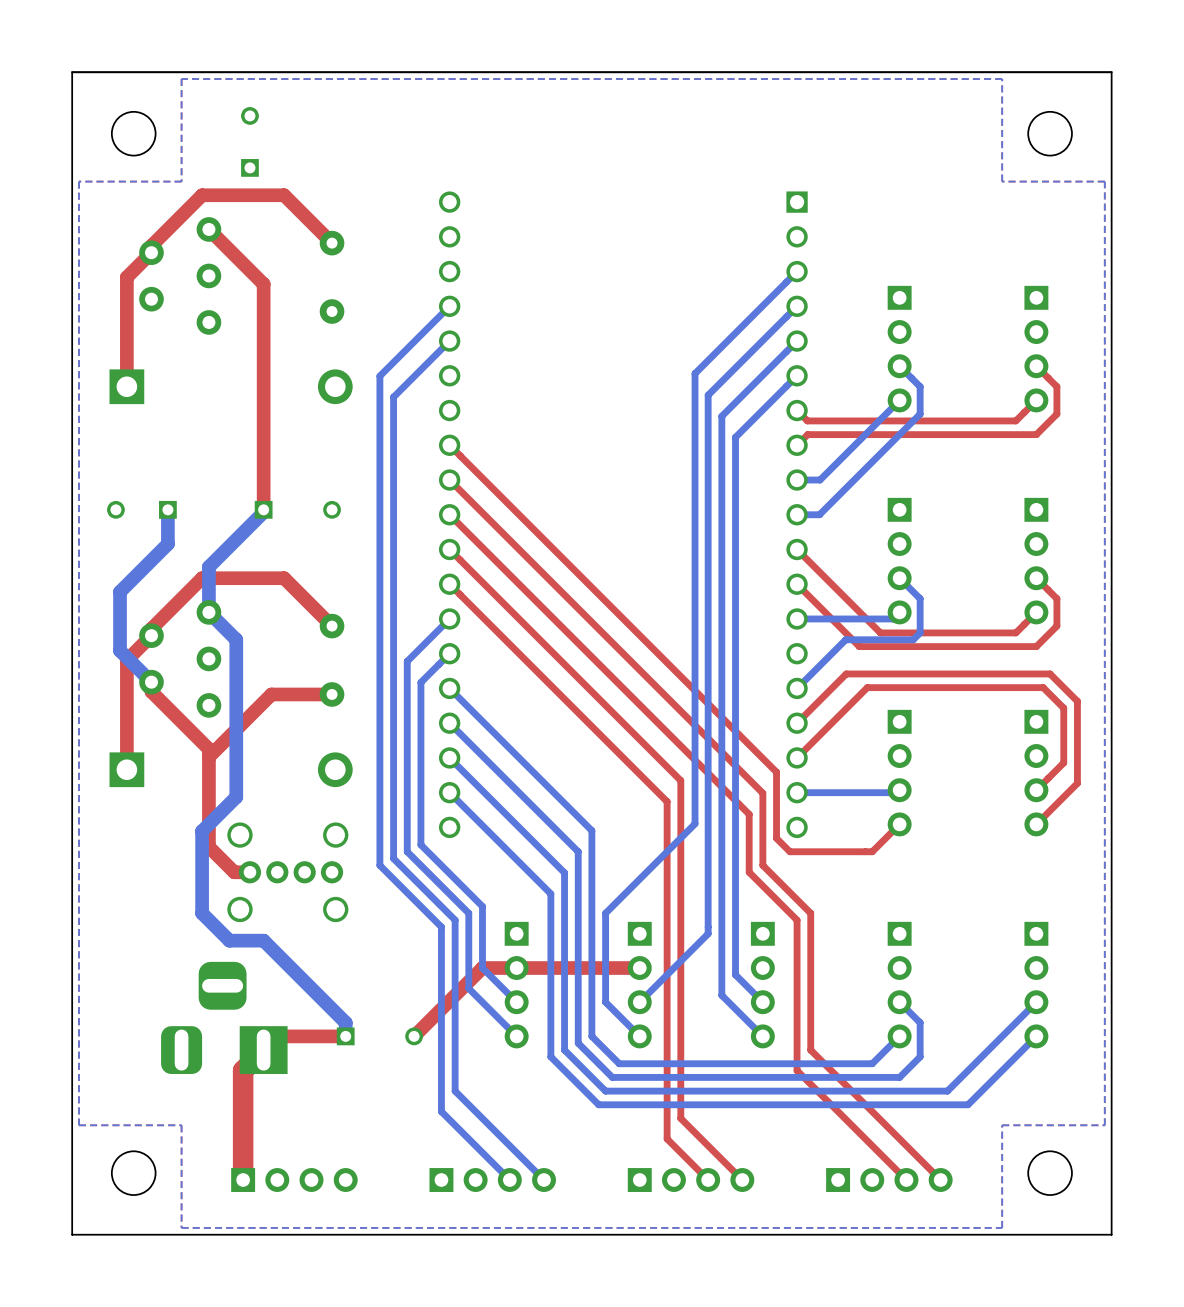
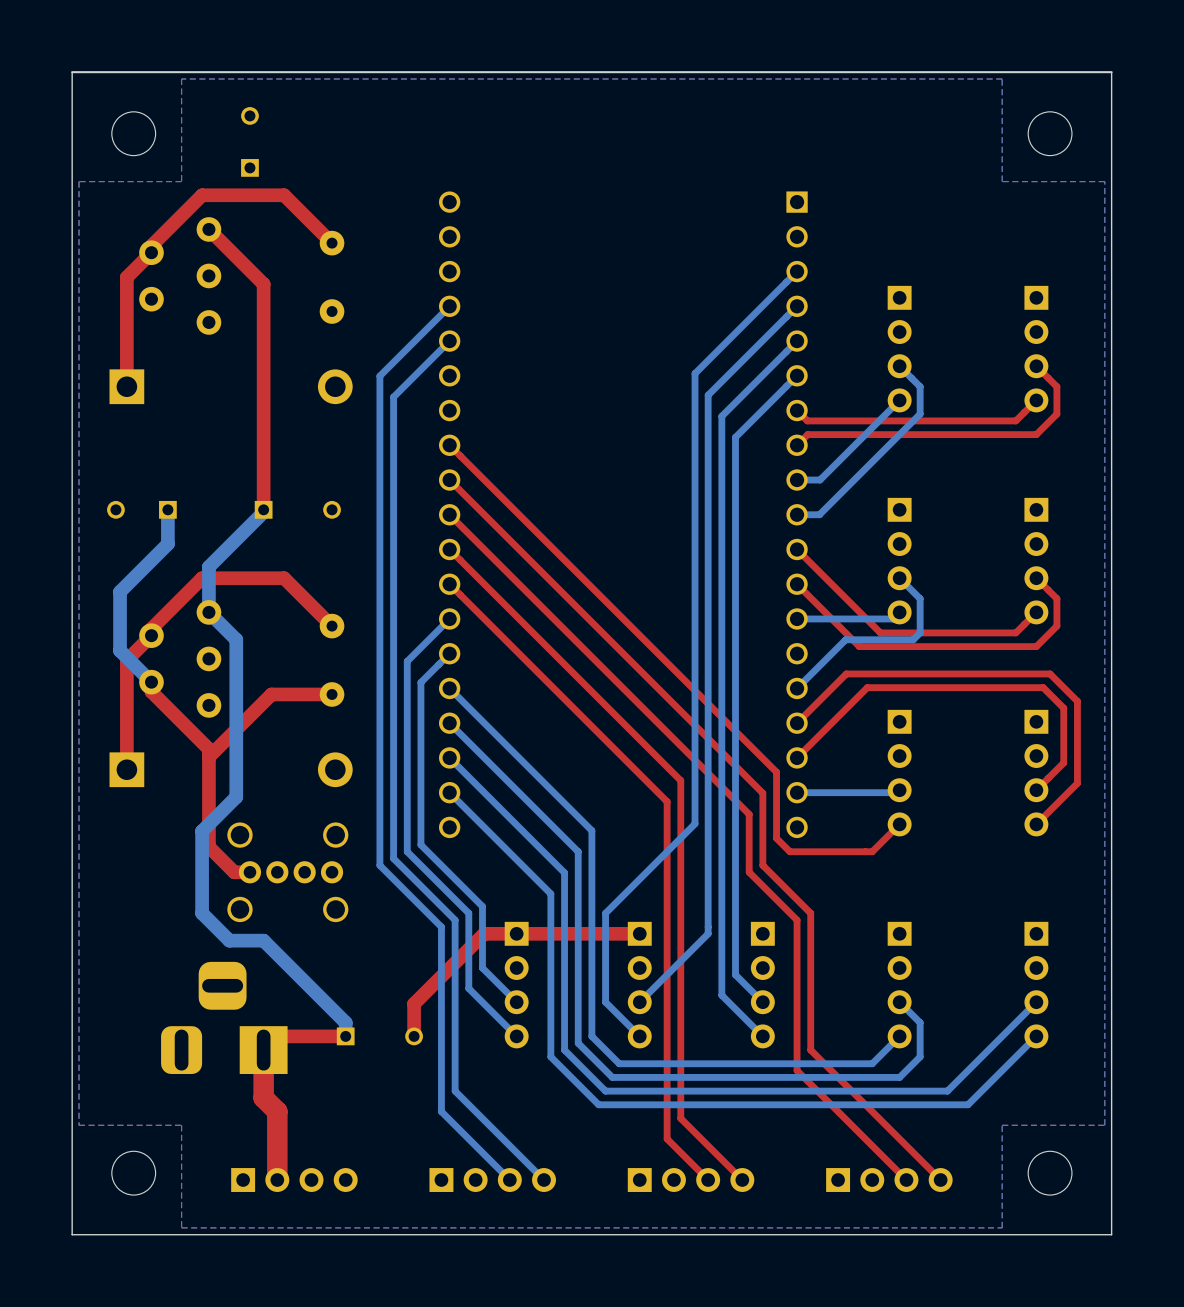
top track: (639, 968) (482, 968) (414, 1036) -> (639, 933) (484, 933) (414, 1003) (414, 1036)
top track: (263, 1050) (243, 1070) (243, 1180) -> none
top track: none -> (277, 1063) (263, 1050) (263, 1097) (277, 1111) (277, 1180)

